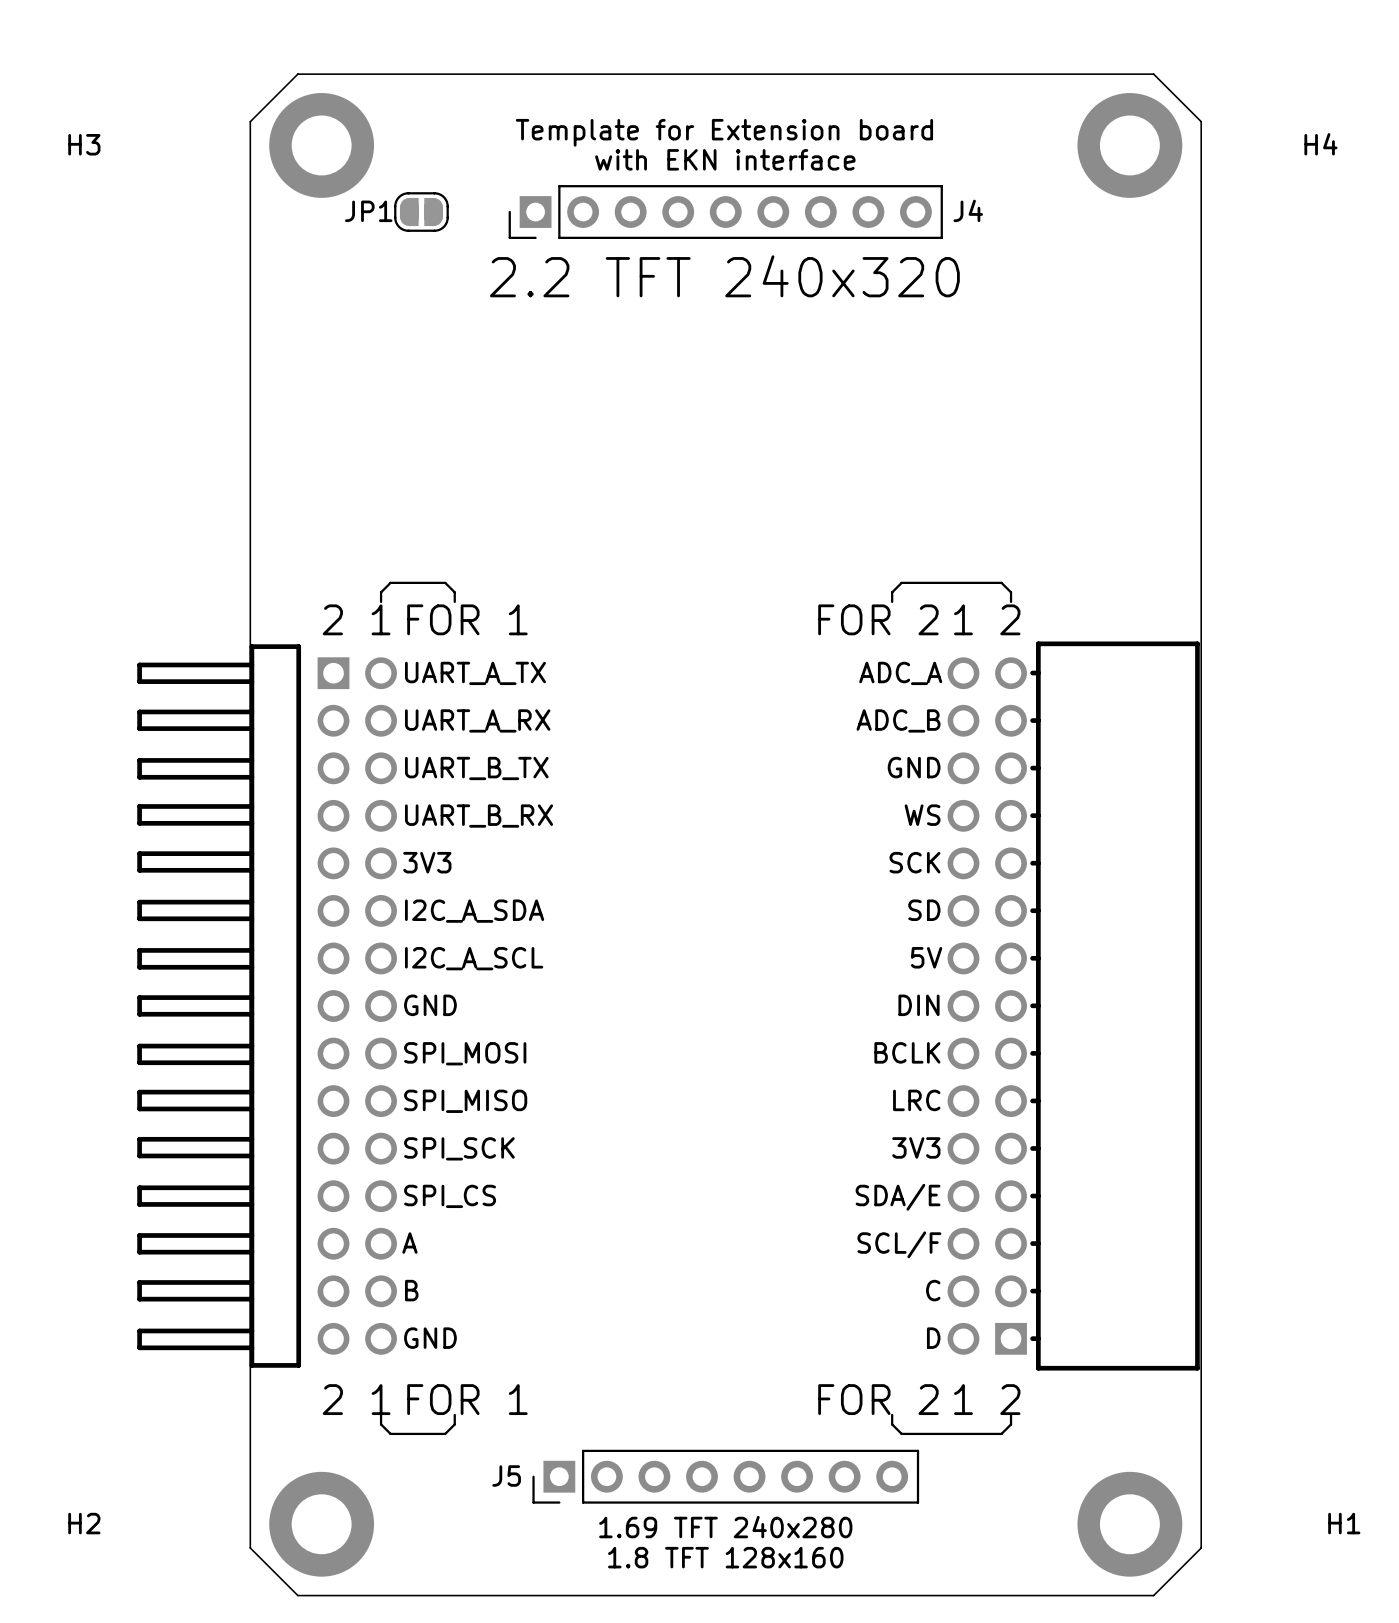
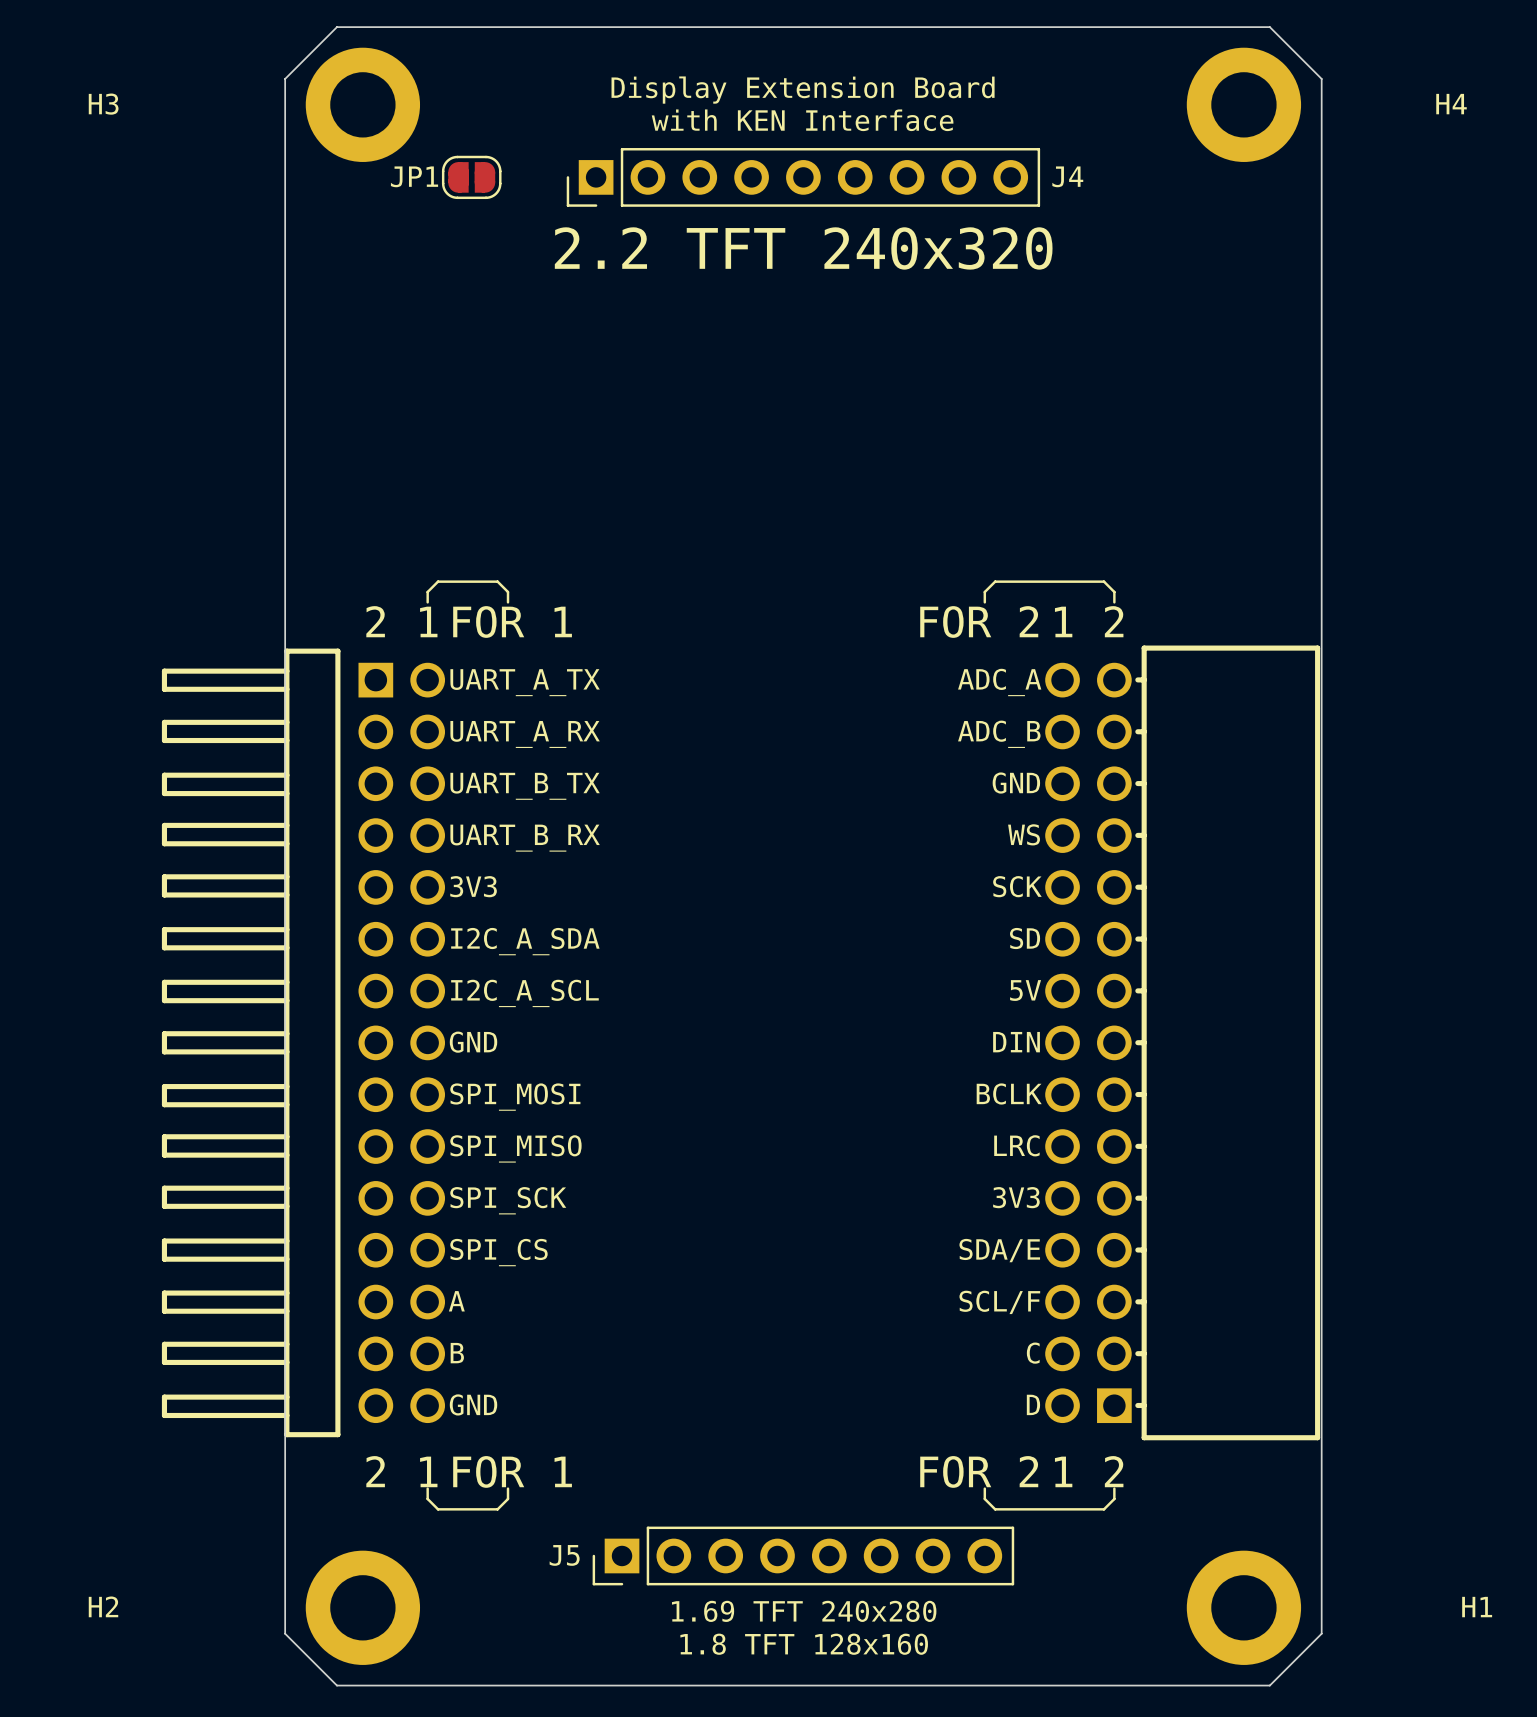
text: Template for Extension board (724, 132) -> Display Extension Board (803, 90)
text: with EKN interface (725, 159) -> with KEN Interface (802, 120)

